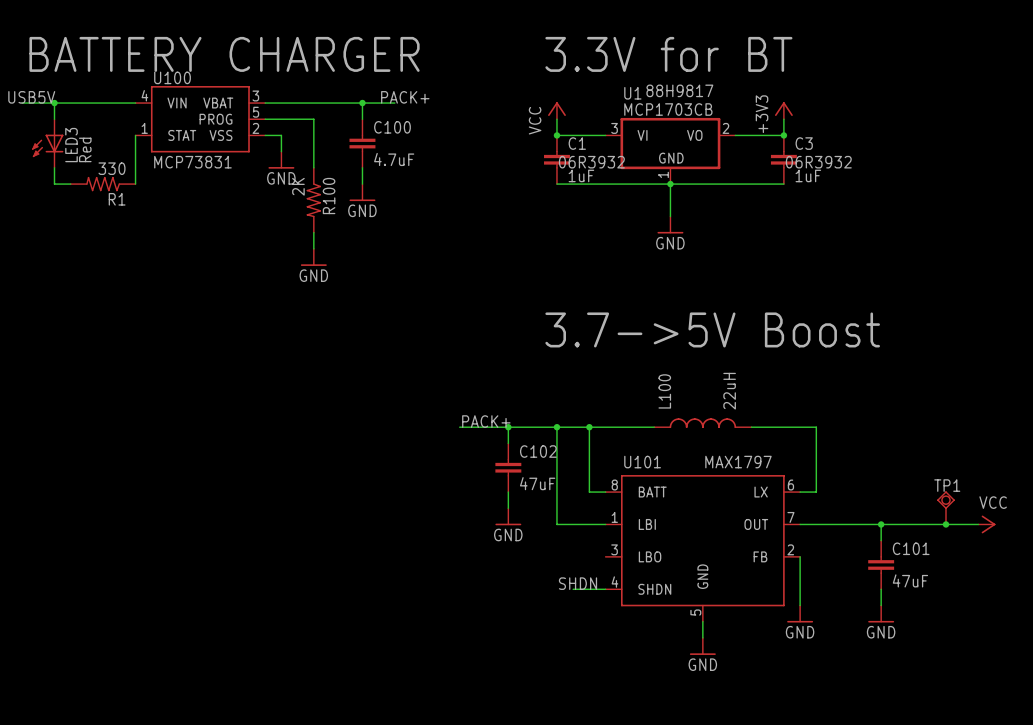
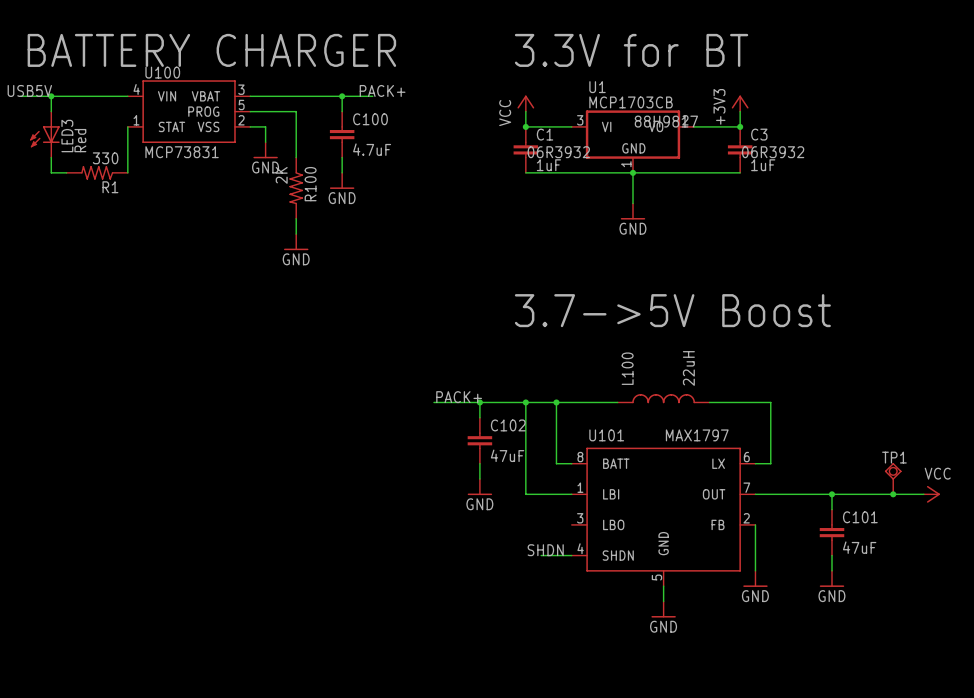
U1 text position: 88H9817 (679, 90) -> 88H9817 (666, 121)

